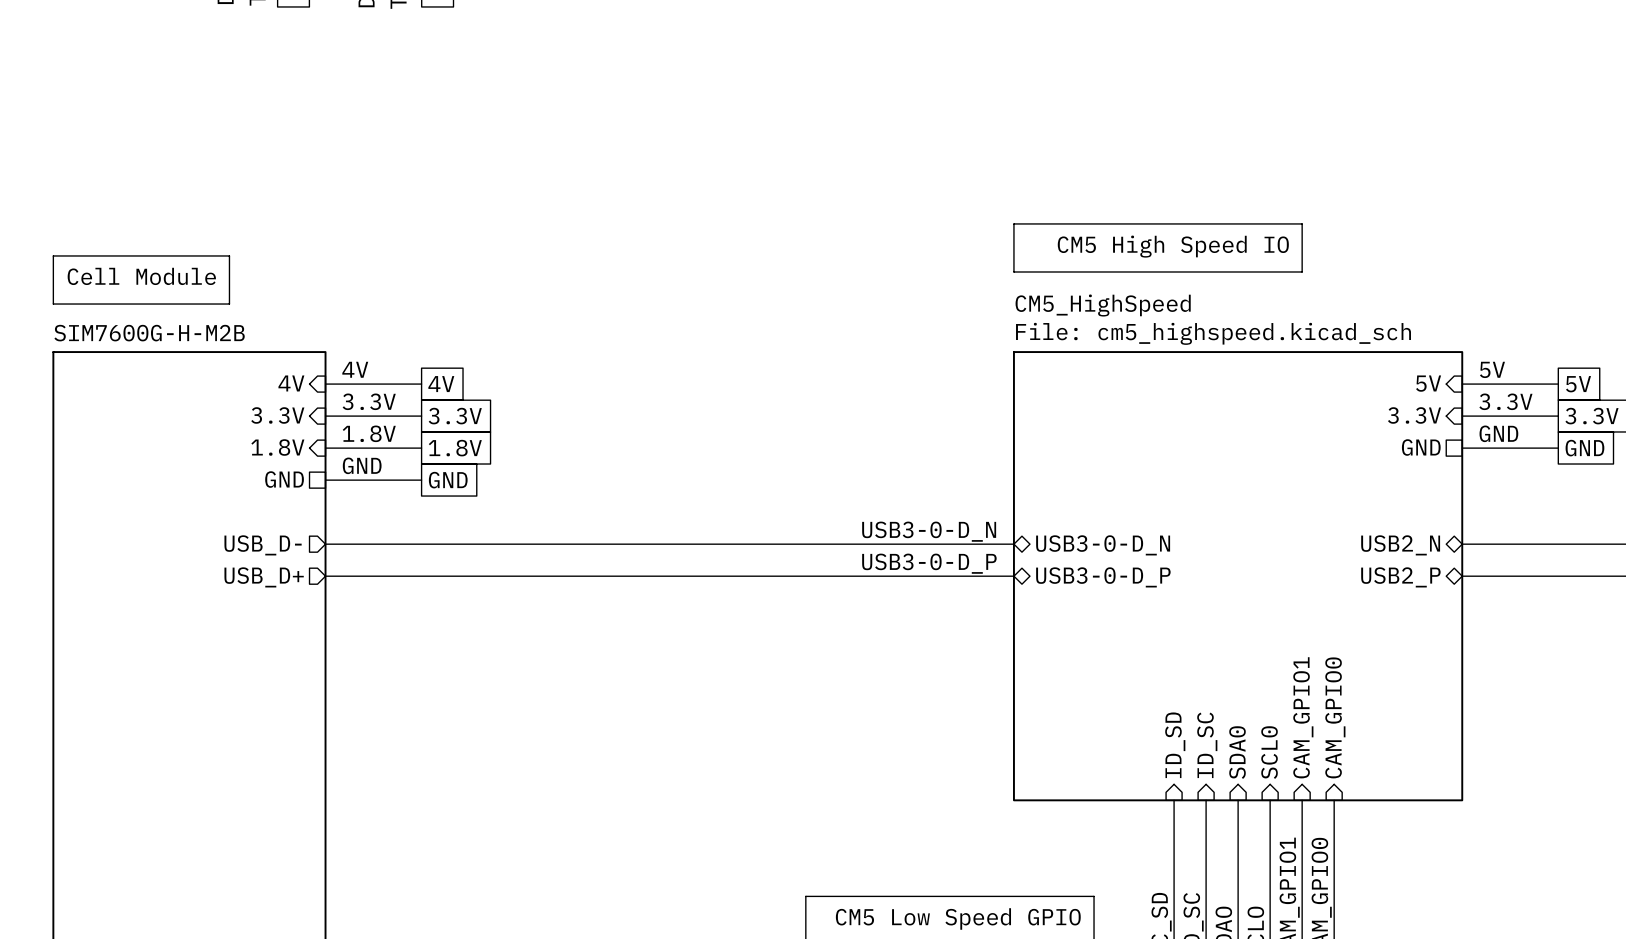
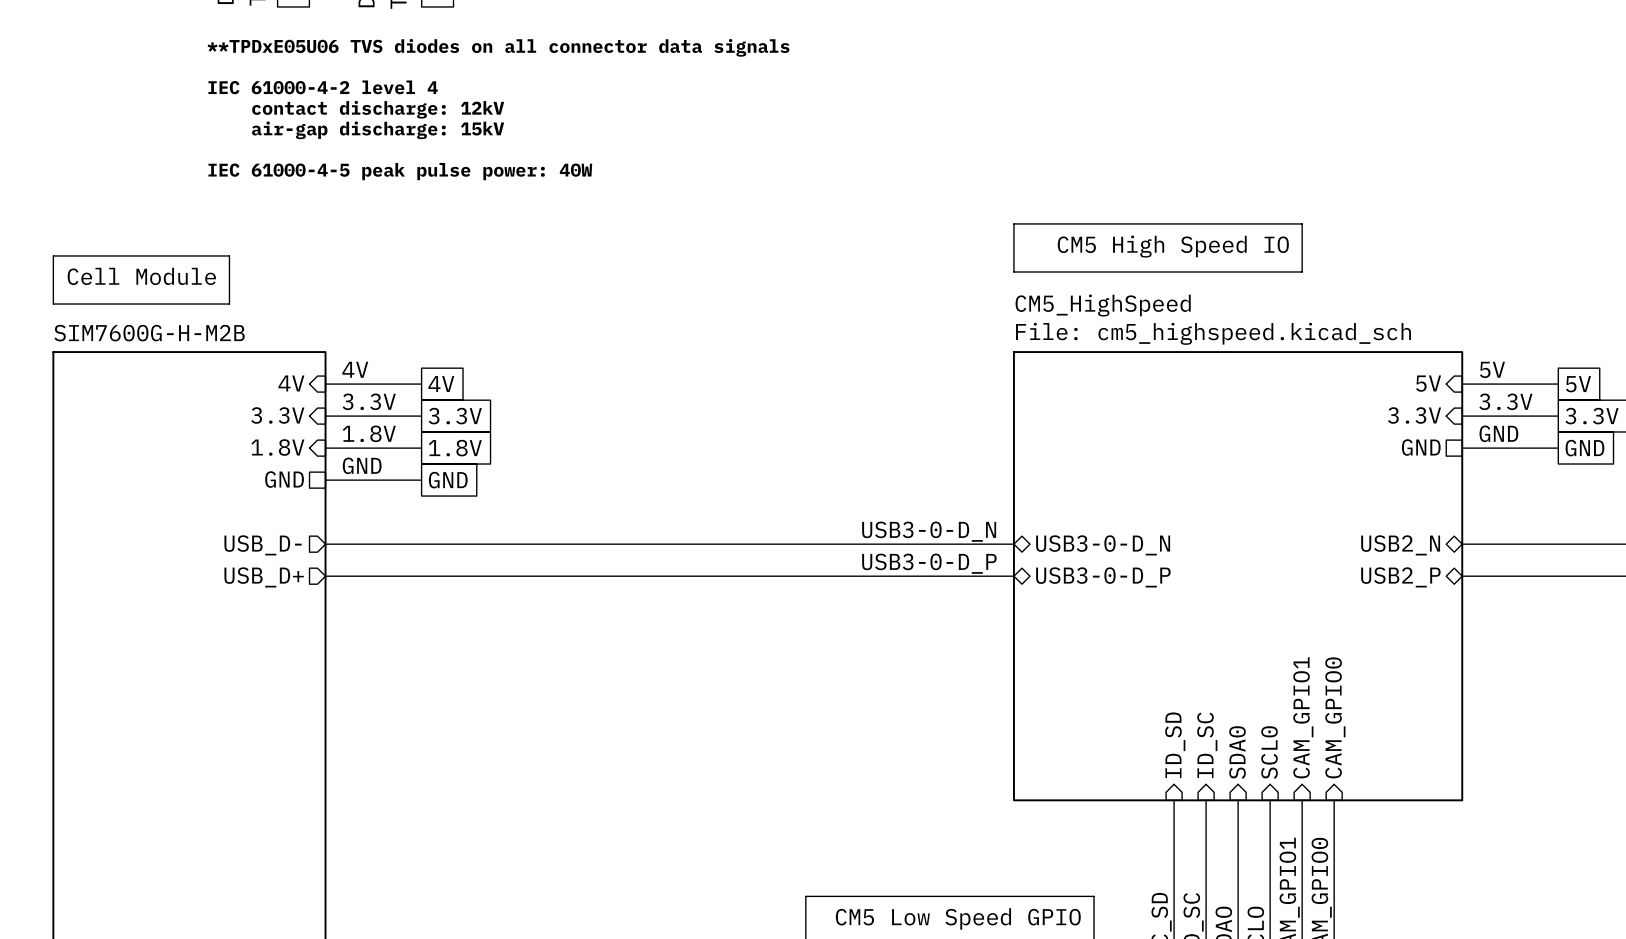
text: none -> **TPDxE05U06 TVS diodes on all connector data signals (498, 47)
text: none -> IEC 61000-4-2 level 4 (323, 87)
text: none -> contact discharge: 12kV (378, 109)
text: none -> air-gap discharge: 15kV (378, 130)
text: none -> IEC 61000-4-5 peak pulse power: 40W (400, 171)

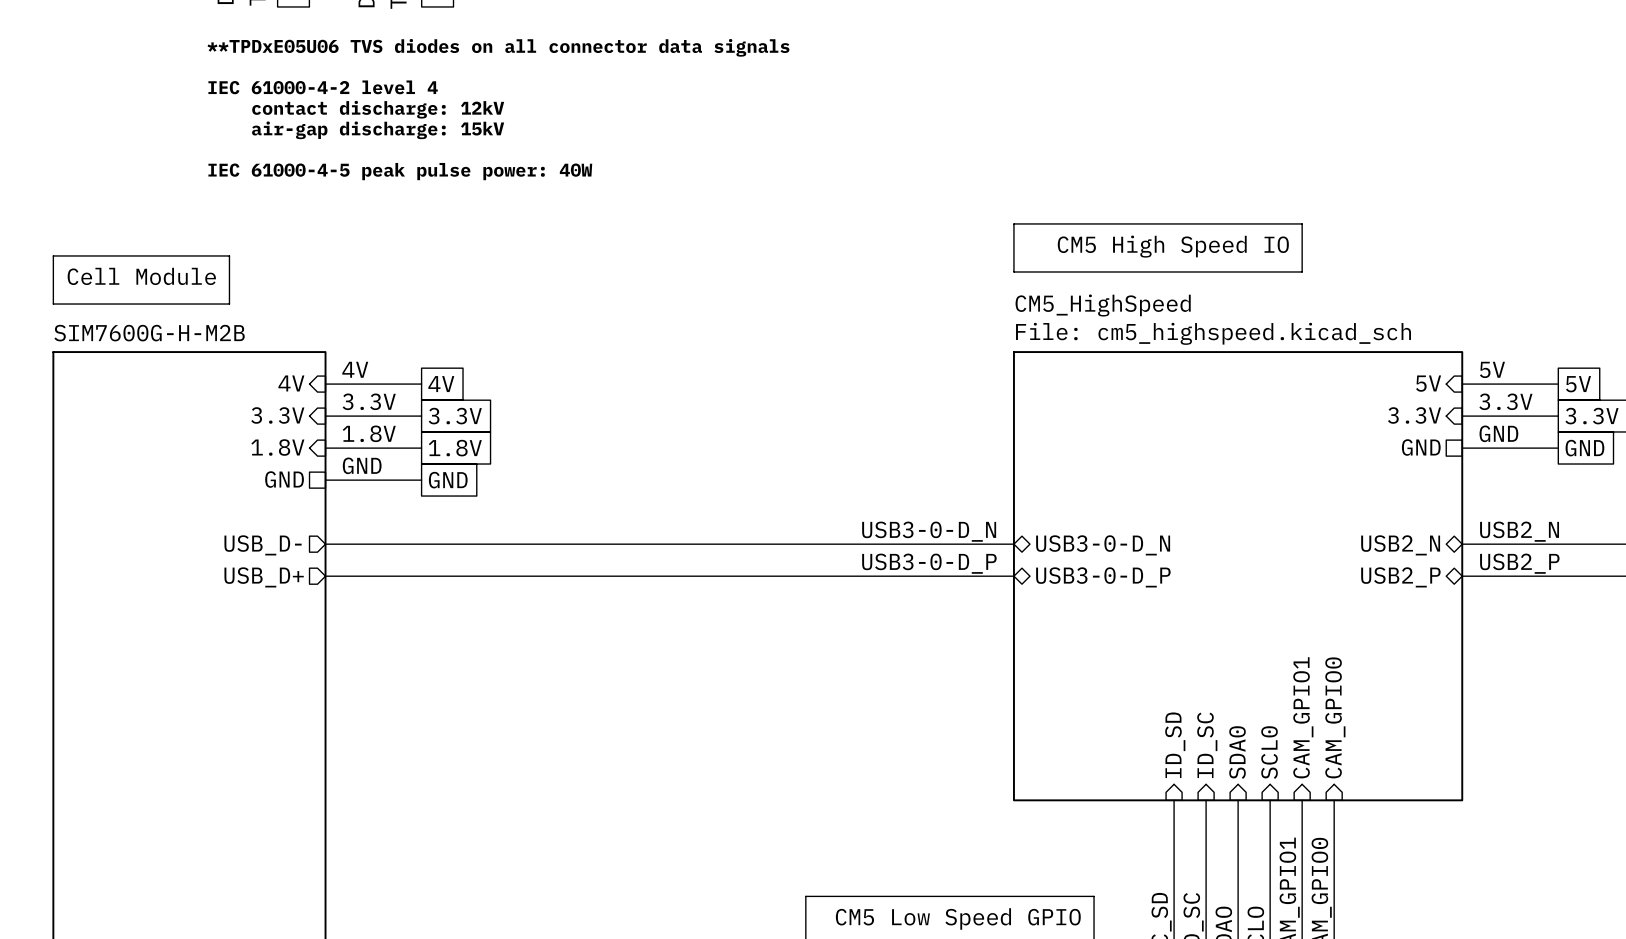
label: none -> USB2_N (1519, 531)
label: none -> USB2_P (1519, 563)

